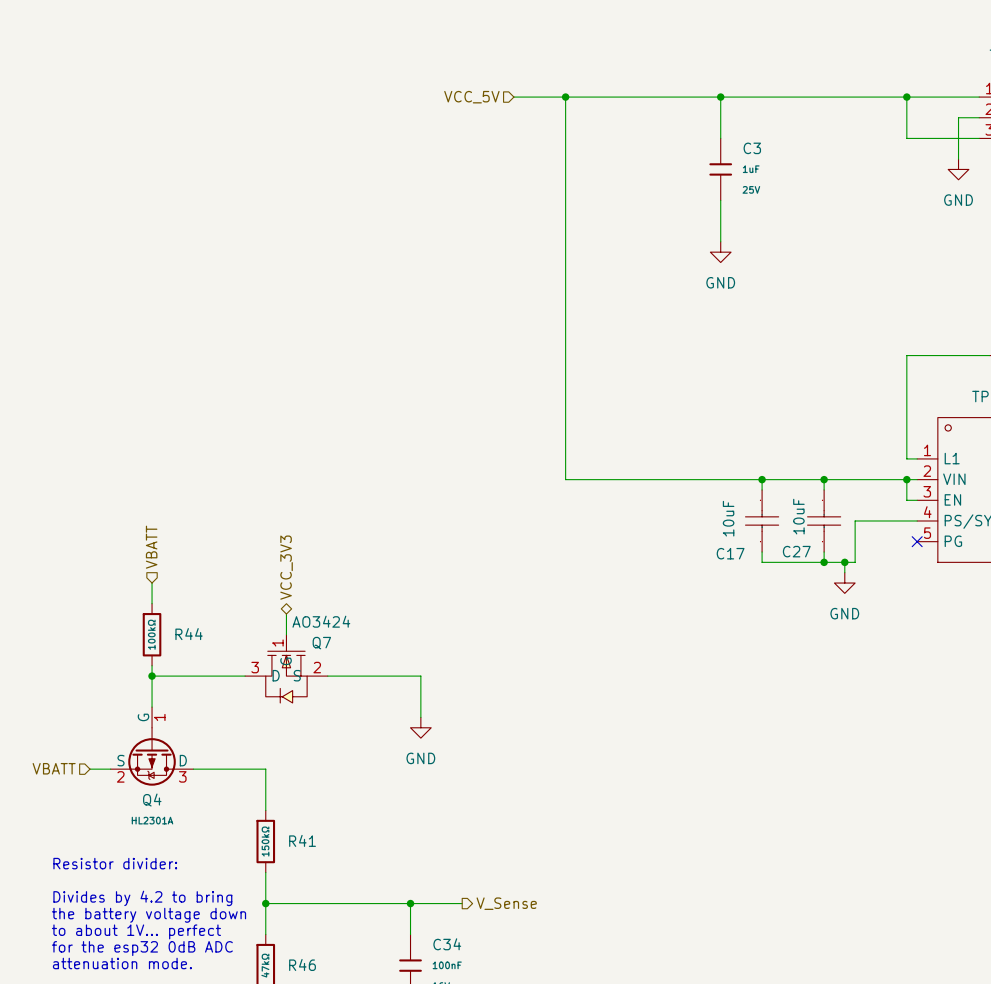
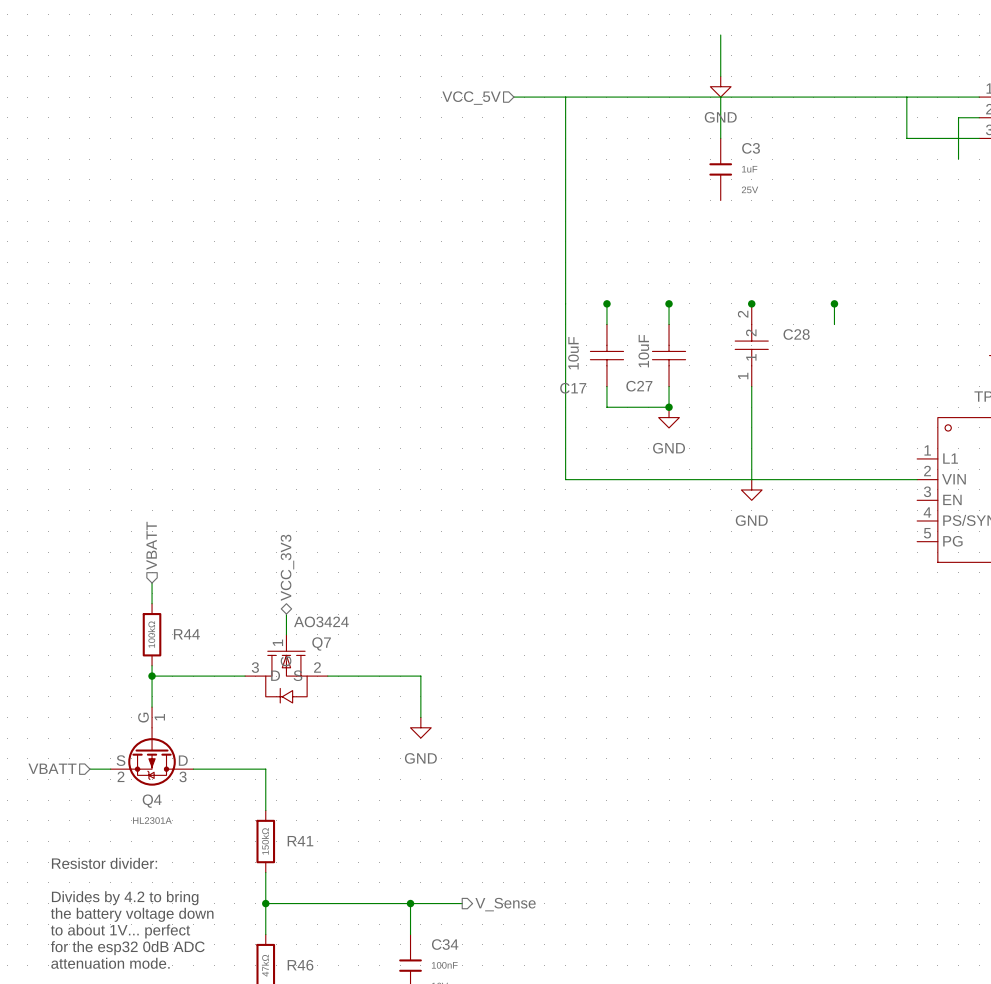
power symbol: none -> GND (720, 86)
junction: (565, 97) -> none
junction: (720, 97) -> none
junction: (906, 97) -> none
power symbol: GND (958, 169) -> none
wire: (720, 200) (720, 241) -> (720, 35) (720, 76)
power symbol: GND (720, 252) -> none
wire: none -> (606, 303) (606, 324)
junction: none -> (606, 303)
wire: none -> (669, 303) (669, 324)
junction: none -> (669, 303)
junction: none -> (751, 303)
wire: none -> (834, 303) (834, 324)
junction: none -> (834, 303)
C28: none -> (751, 345)
wire: (989, 355) (906, 355) (906, 458) (917, 458) -> none
wire: none -> (606, 386) (606, 407) (669, 407) (669, 386)
wire: none -> (751, 386) (751, 479)
junction: none -> (669, 407)
power symbol: none -> GND (669, 417)
wire: (762, 479) (762, 489) -> none
junction: (762, 479) -> none
wire: (824, 479) (824, 489) -> none
junction: (824, 479) -> none
wire: (906, 479) (906, 500) (917, 500) -> none
junction: (906, 479) -> none
power symbol: none -> GND (751, 489)
C17 position: (762, 520) -> (606, 355)
C27 position: (824, 520) -> (669, 355)
wire: (917, 520) (855, 520) (855, 562) (762, 562) (762, 552) -> none
no-connect mark: (917, 541) -> none
wire: (824, 552) (824, 562) -> none
junction: (824, 562) -> none
wire: (844, 562) (844, 572) -> none
junction: (844, 562) -> none
power symbol: GND (844, 583) -> none

